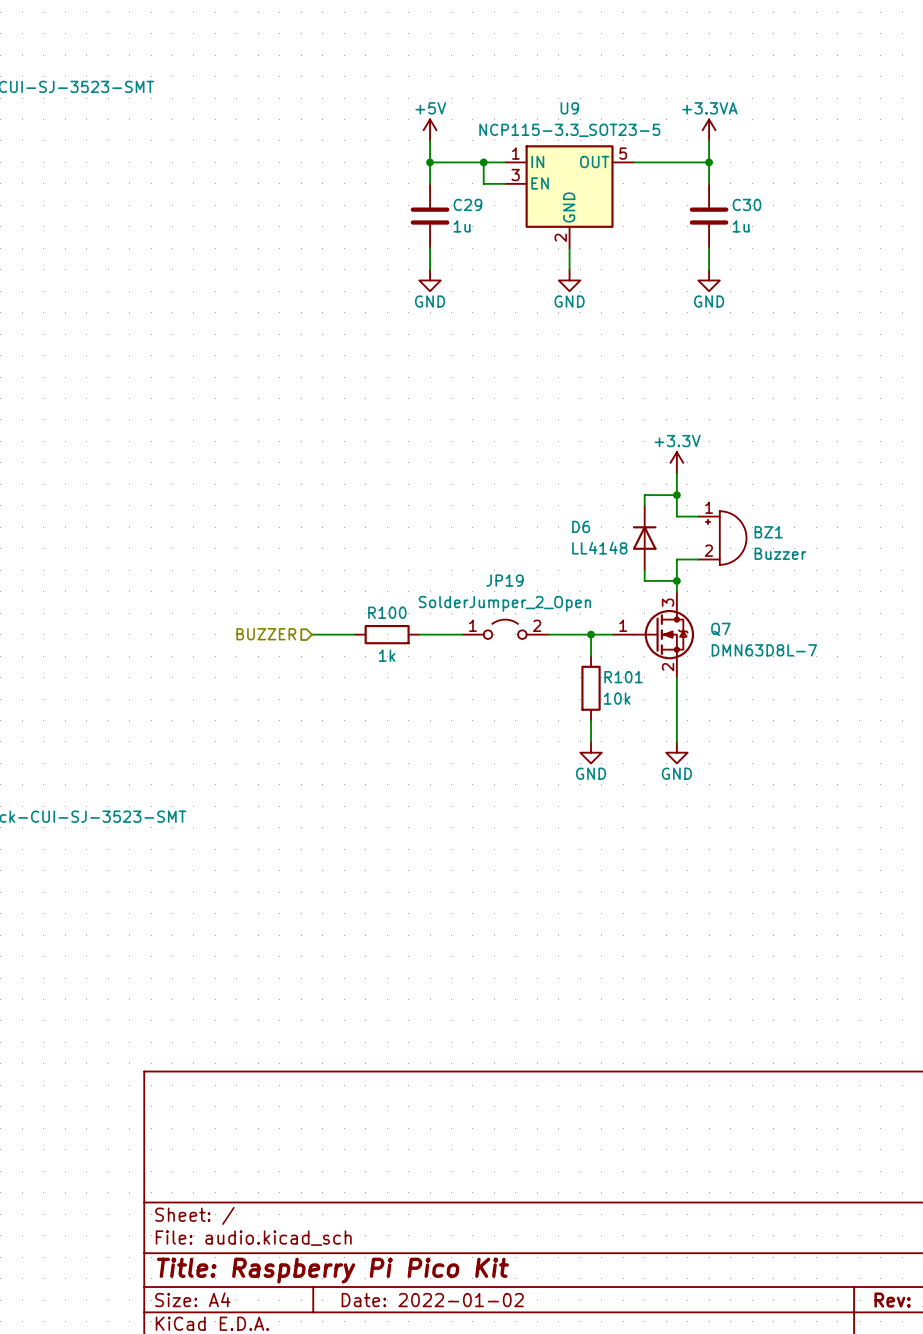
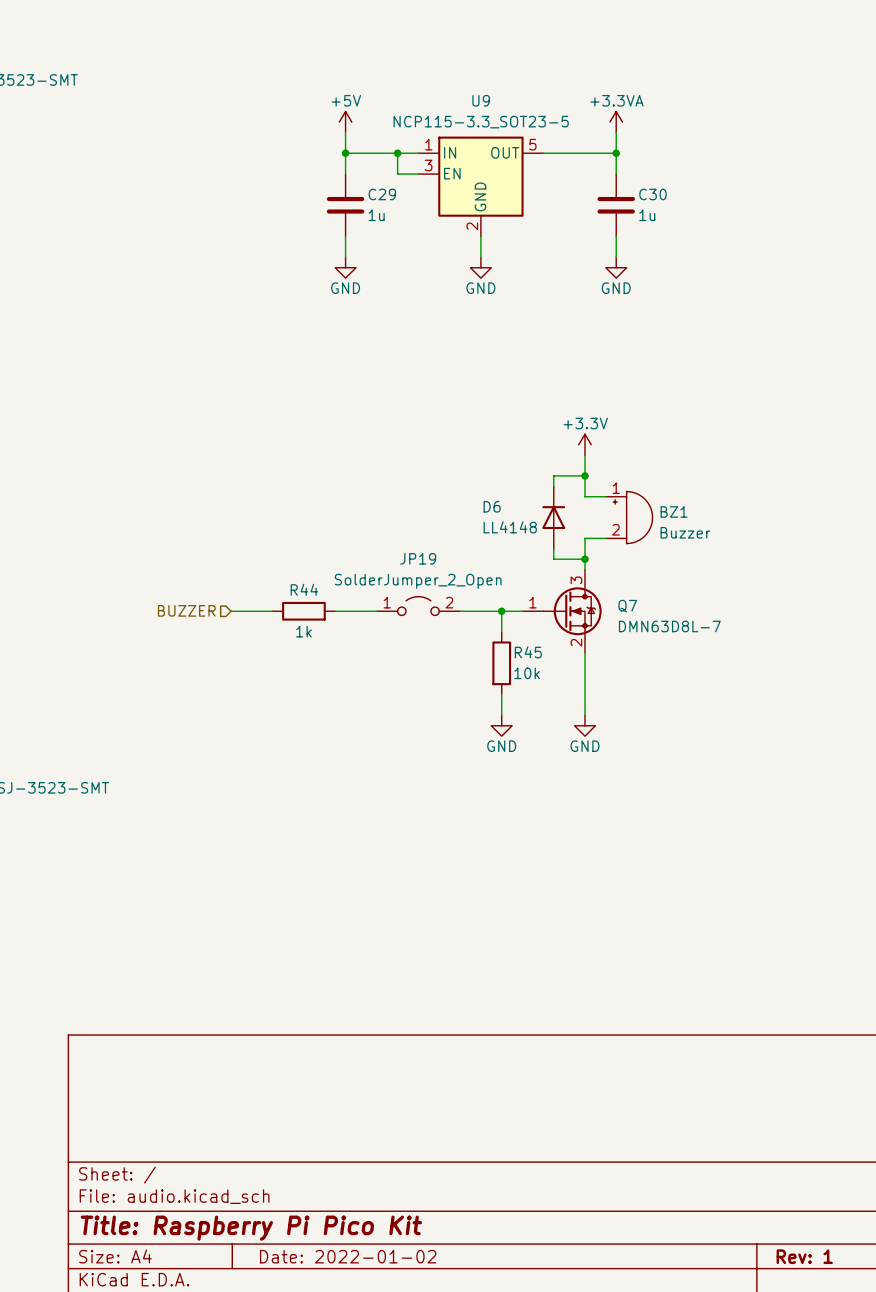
R100 name: R100 (387, 612) -> R44 (304, 589)
R101 name: R101 (623, 677) -> R45 (528, 652)

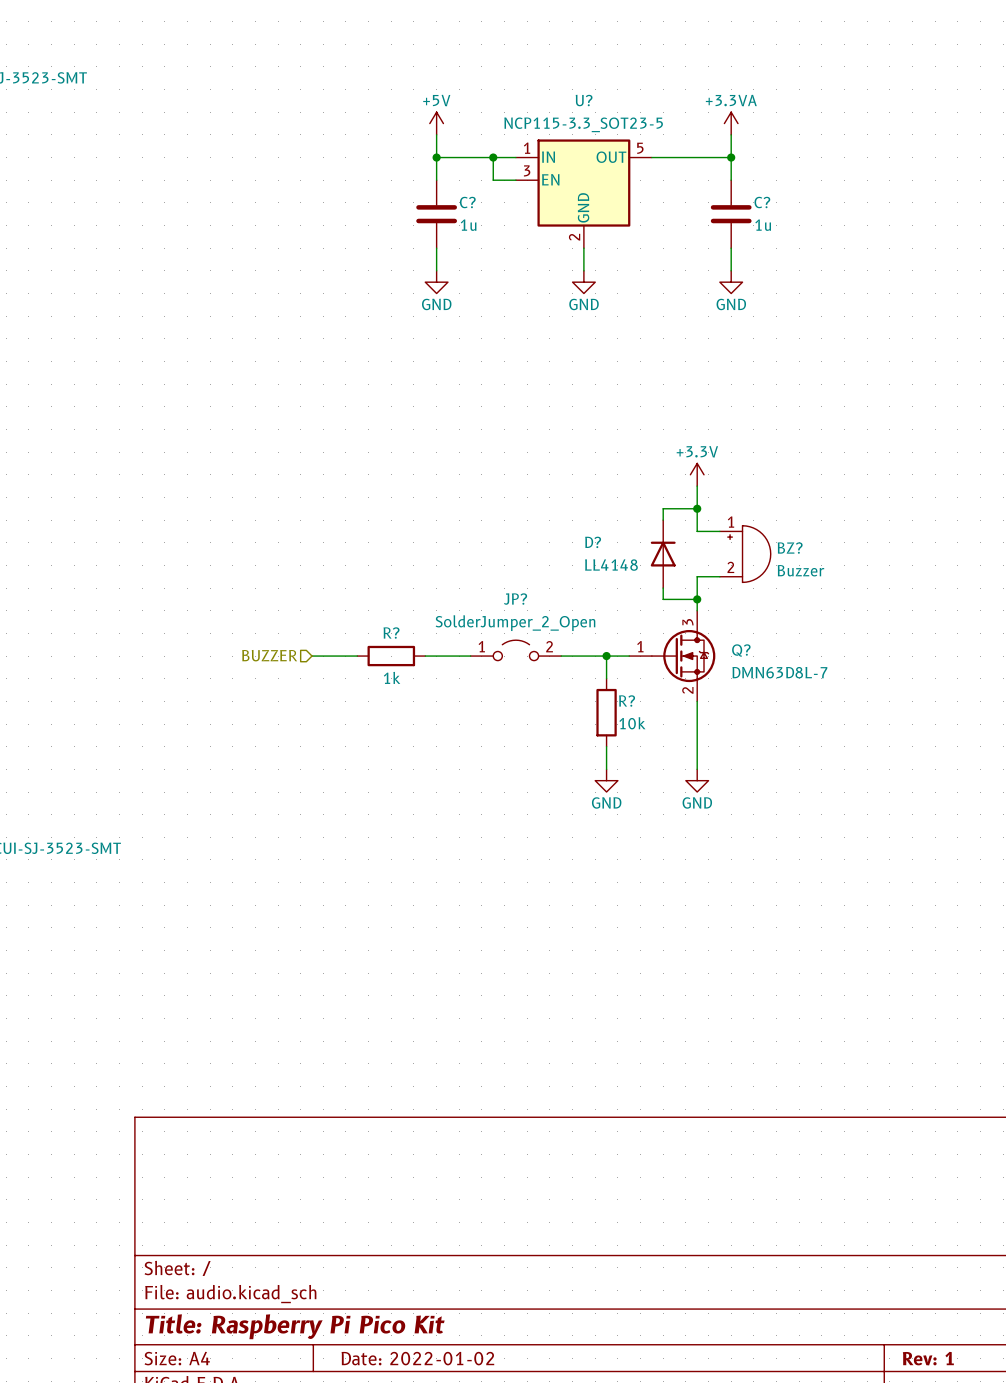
U9 name: U9 (481, 100) -> U? (584, 100)
C29 name: C29 (382, 194) -> C? (467, 202)
C30 name: C30 (652, 194) -> C? (762, 202)
D6 name: D6 (492, 506) -> D? (593, 542)
BZ1 name: BZ1 (674, 511) -> BZ? (790, 548)
JP19 name: JP19 (418, 558) -> JP? (515, 599)
R44 name: R44 (304, 589) -> R? (391, 633)
Q7 name: Q7 (627, 606) -> Q? (741, 650)
R45 name: R45 (528, 652) -> R? (627, 701)

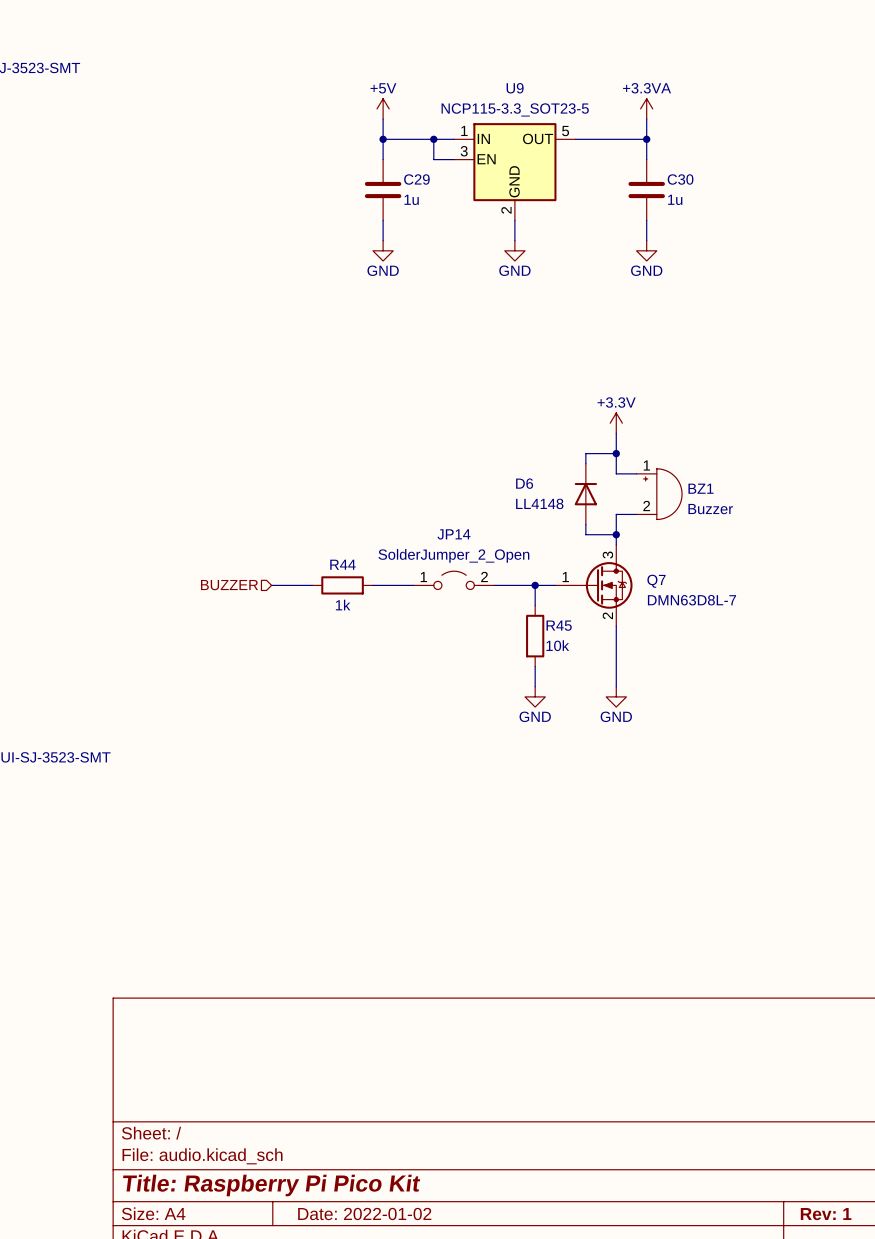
U? name: U? (584, 100) -> U9 (515, 88)
C? name: C? (467, 202) -> C29 (416, 179)
C? name: C? (762, 202) -> C30 (680, 179)
D? name: D? (593, 542) -> D6 (524, 483)
BZ? name: BZ? (790, 548) -> BZ1 (701, 488)
JP? name: JP? (515, 599) -> JP14 (453, 534)
R? name: R? (391, 633) -> R44 (342, 564)
Q? name: Q? (741, 650) -> Q7 (656, 581)
R? name: R? (627, 701) -> R45 (559, 625)

